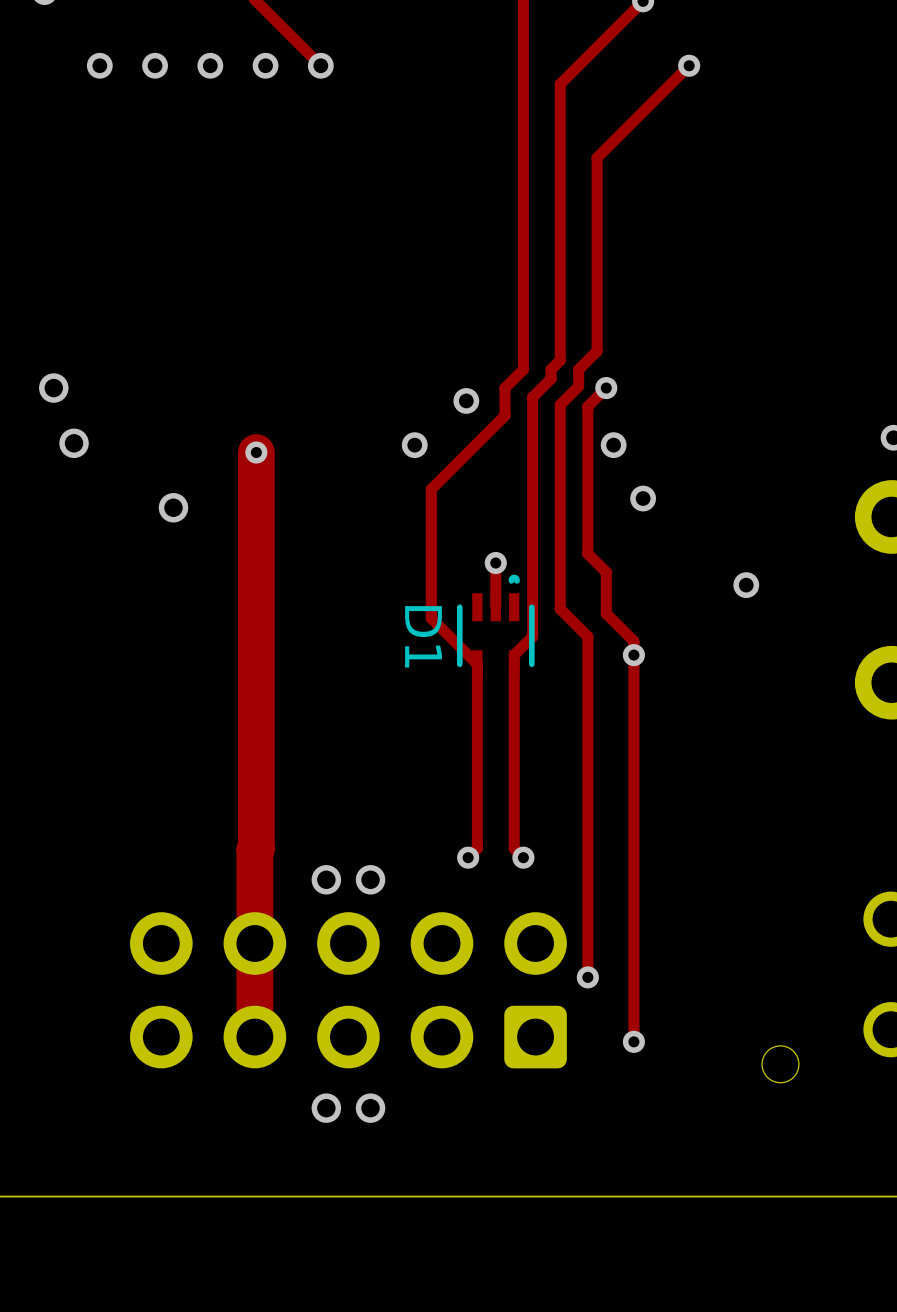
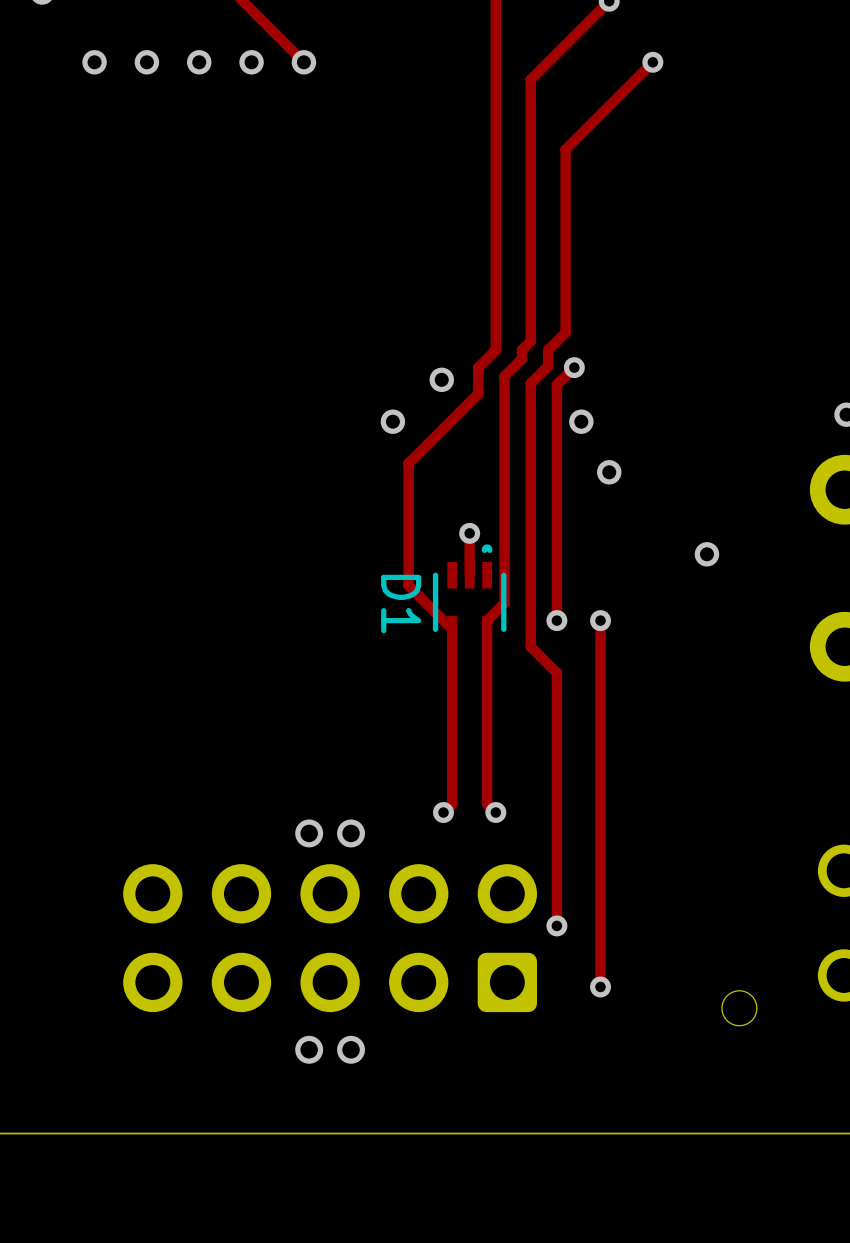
via: (53, 388) -> none
via: (74, 443) -> none
track: (256, 452) (254, 1037) -> none
via: (256, 452) -> none
via: (173, 507) -> none
track: (587, 553) (606, 572) (606, 613) (633, 641) (633, 655) -> (556, 524) (556, 603)
track: (560, 609) (587, 636) -> none
track: (587, 655) (587, 710) -> (530, 576) (530, 646) (556, 672)
via: none -> (556, 620)

